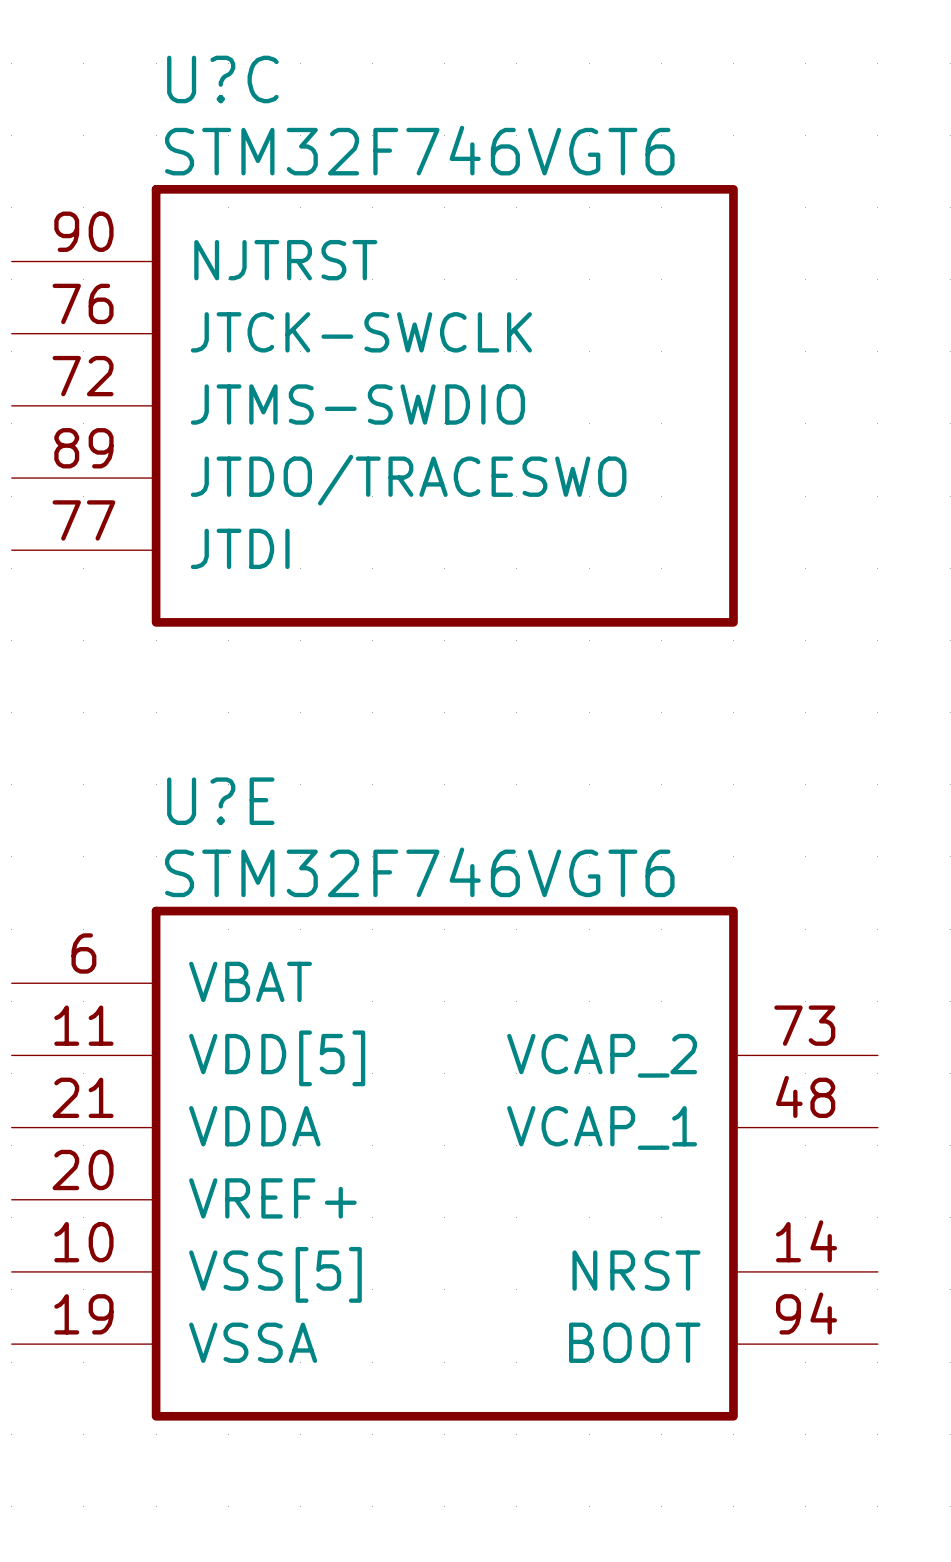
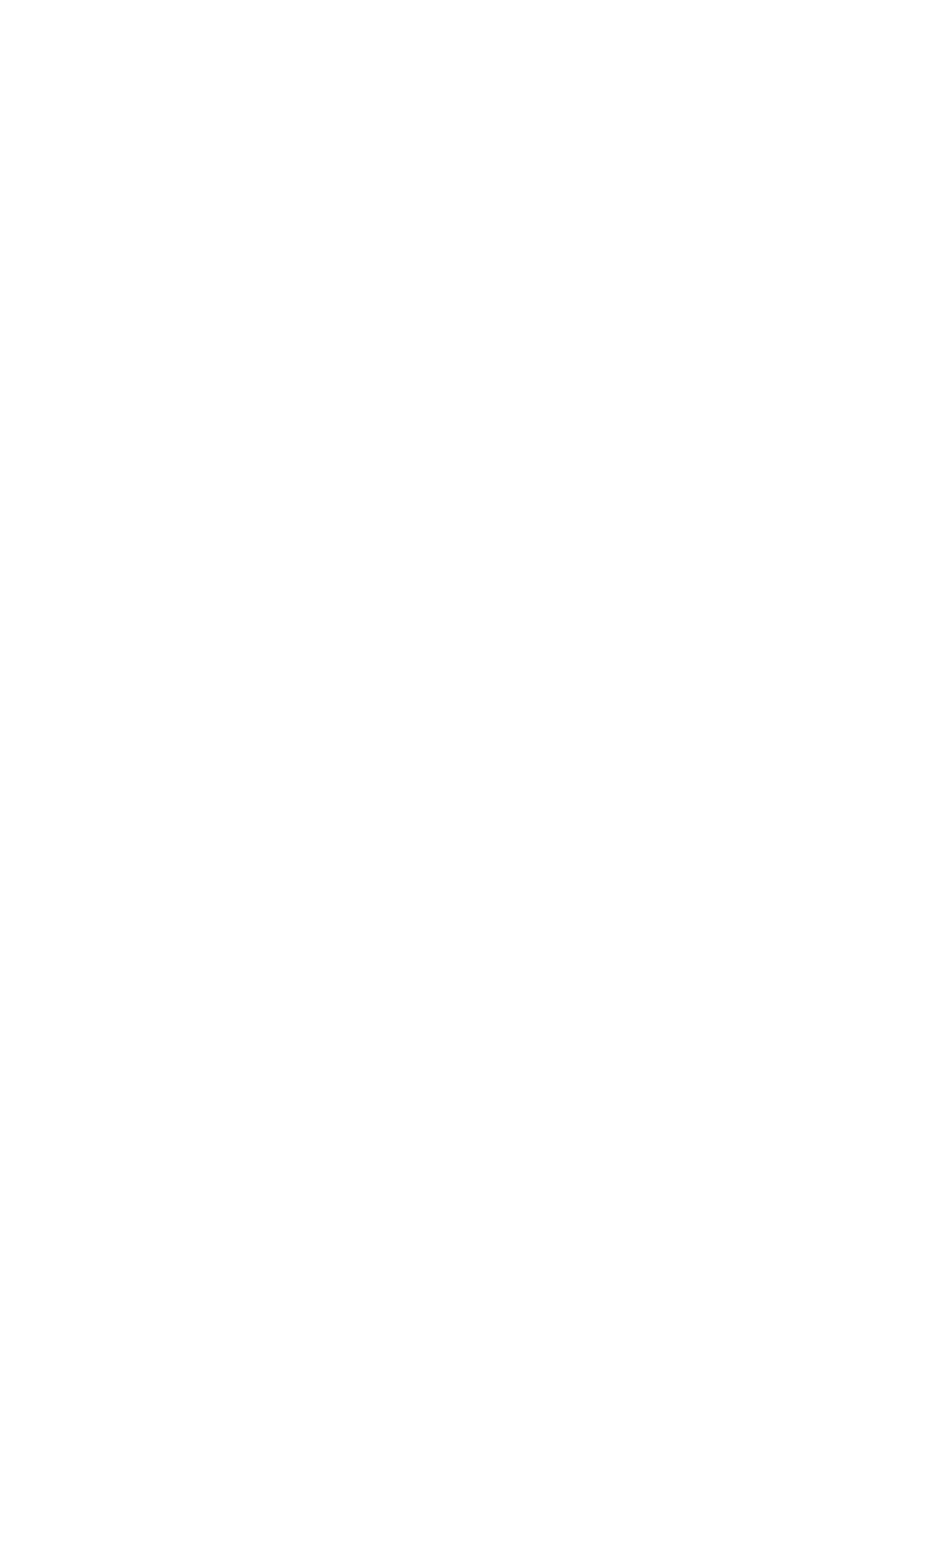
U?C: STM32F746VGT6 (374, 405) -> none
U?E: STM32F746VGT6 (444, 1163) -> none

